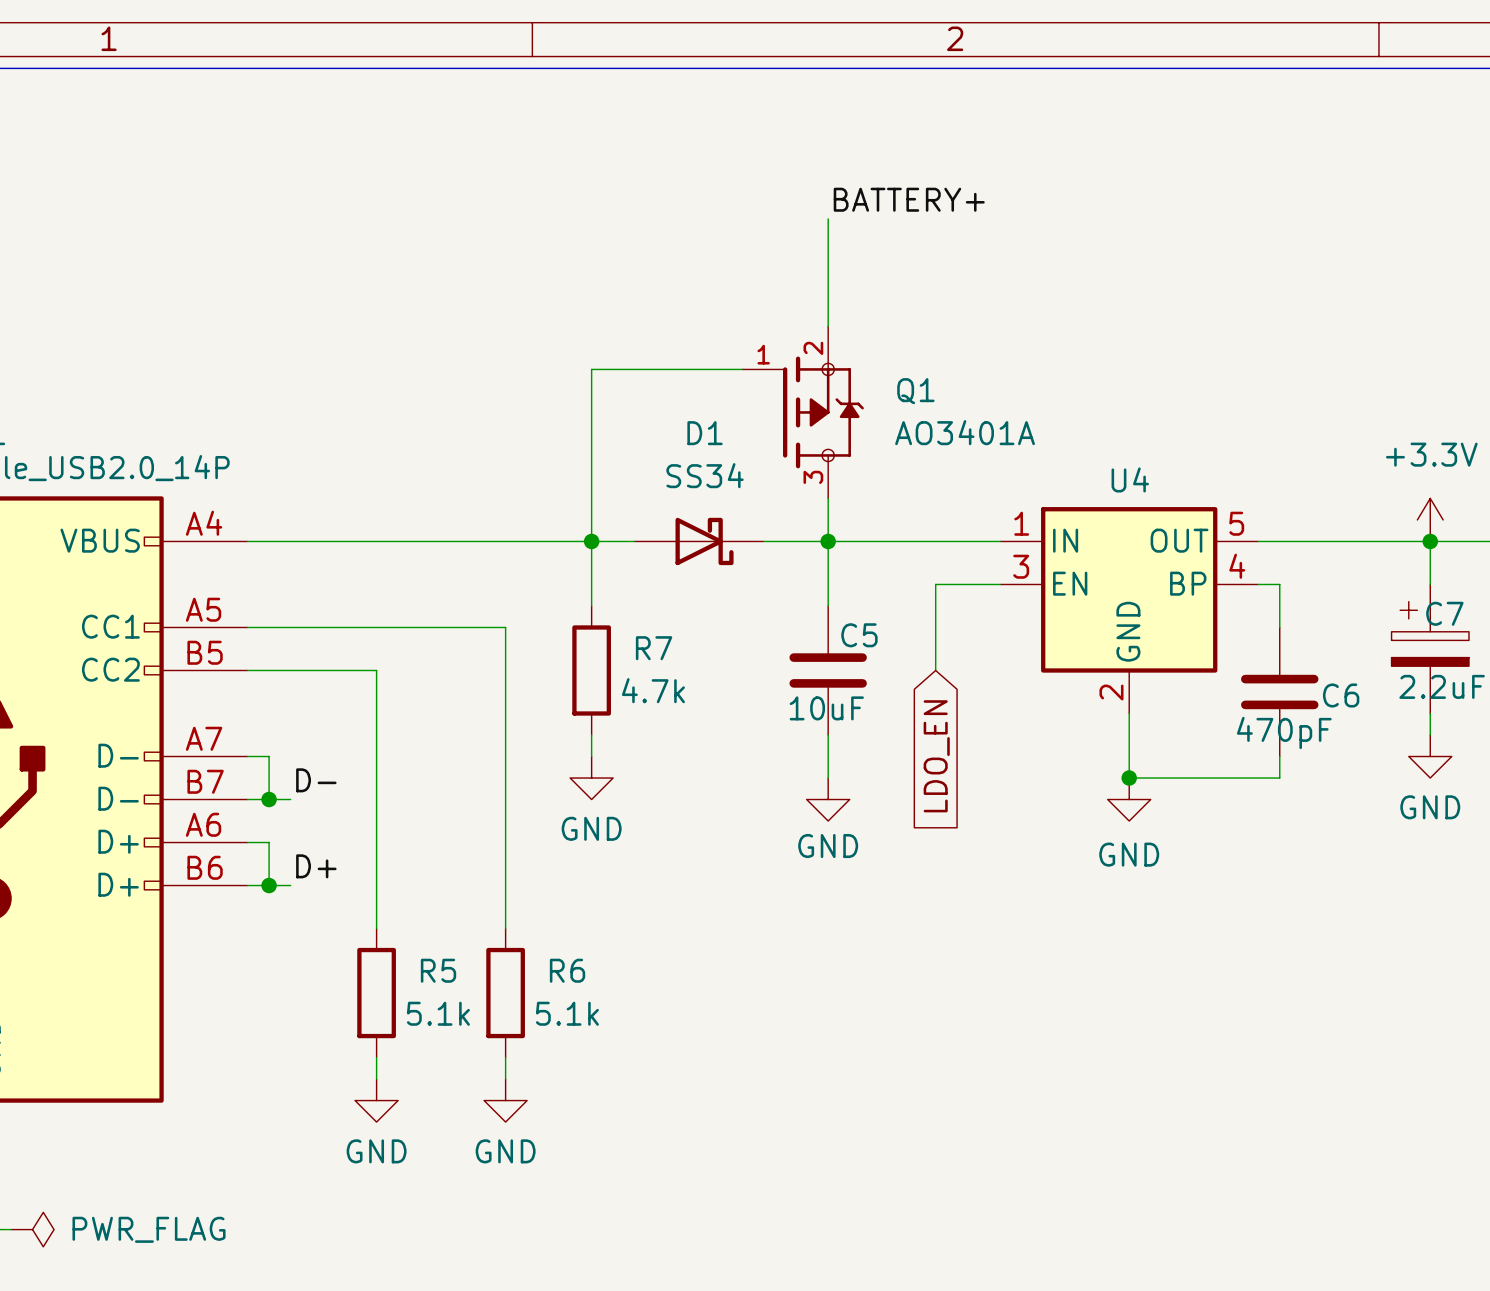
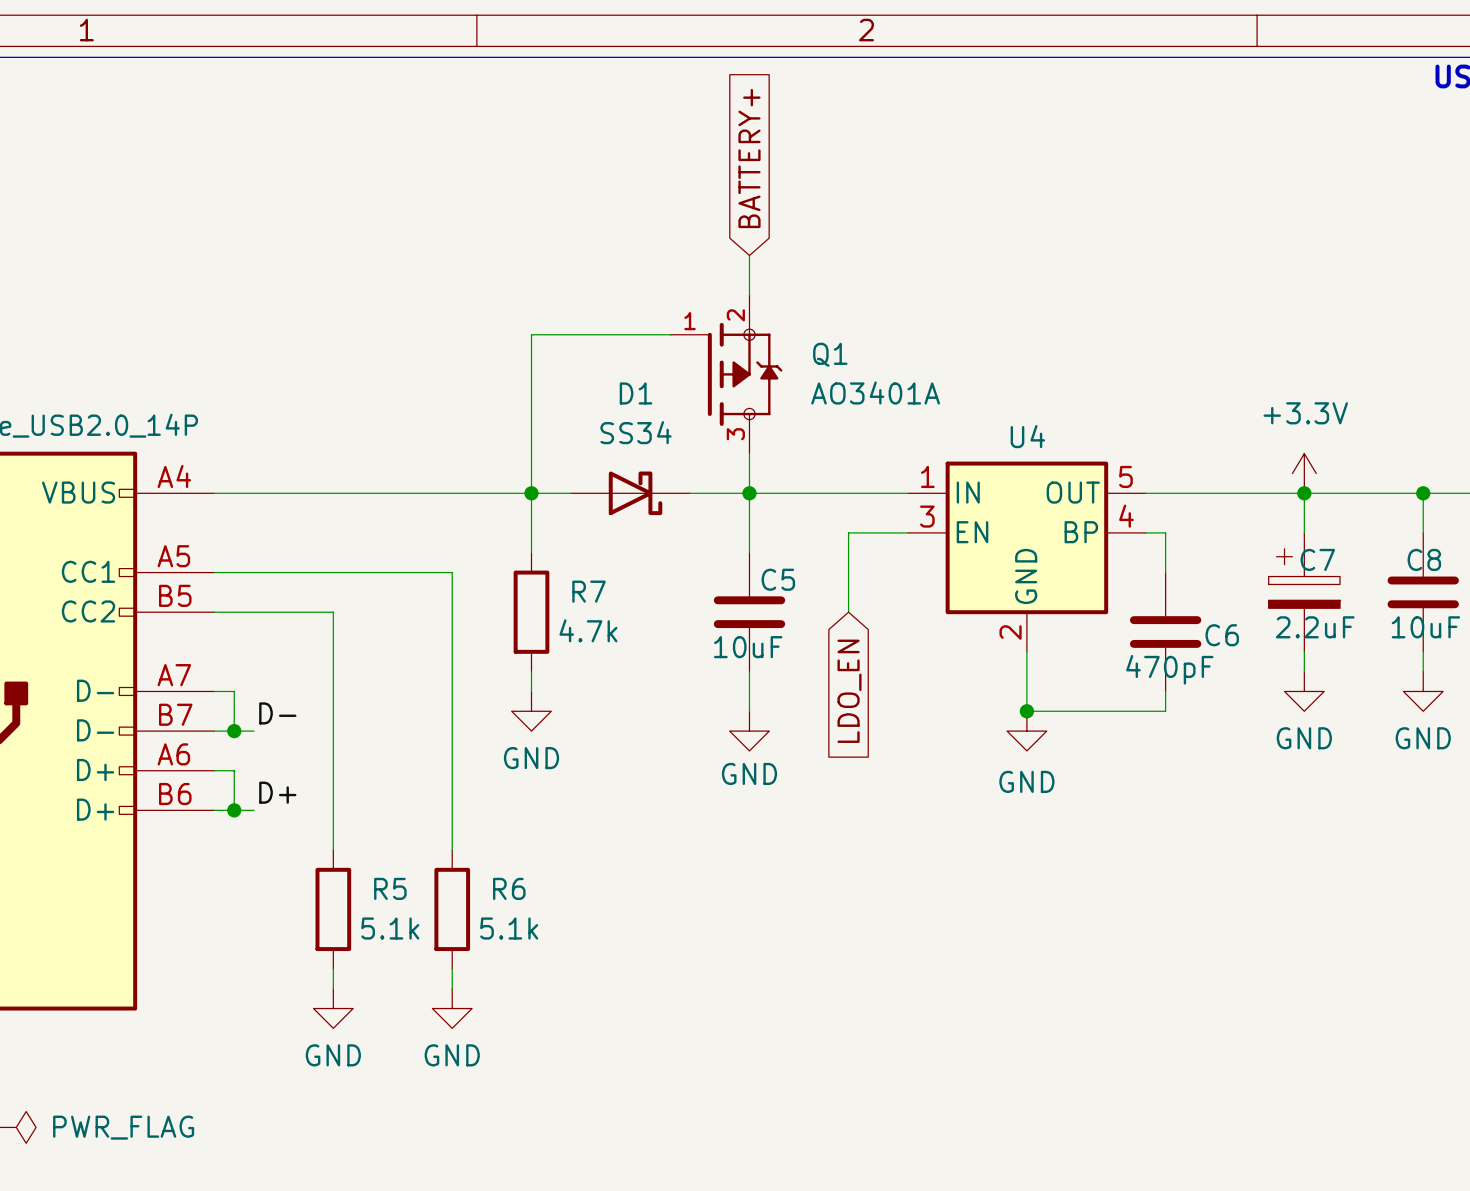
global label: none -> BATTERY+ (749, 158)
label: BATTERY+ (909, 199) -> none
wire: (828, 218) (828, 283) -> none

